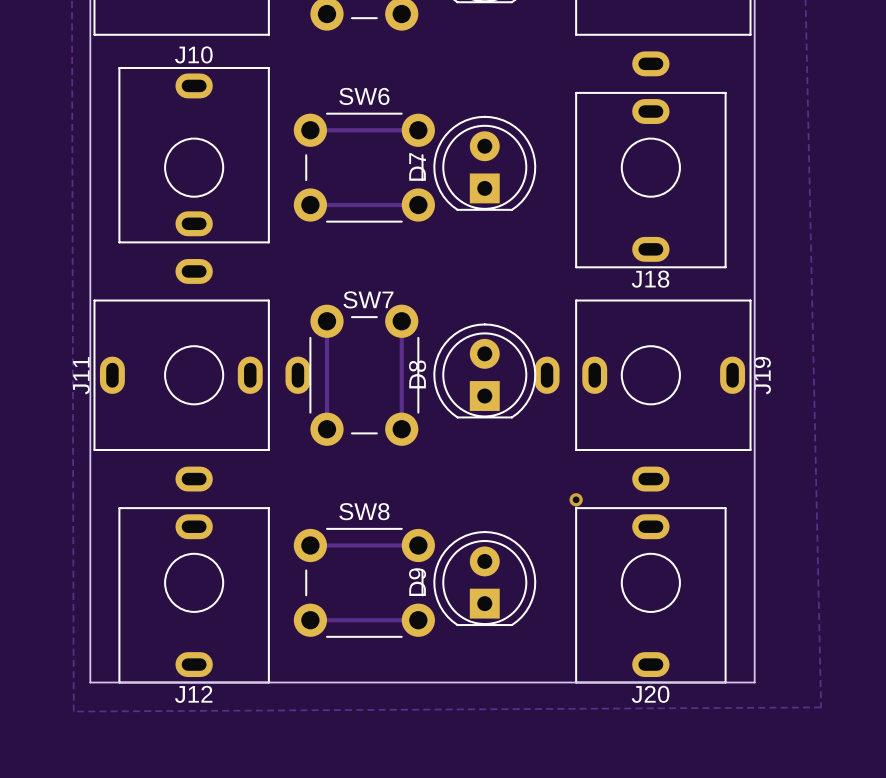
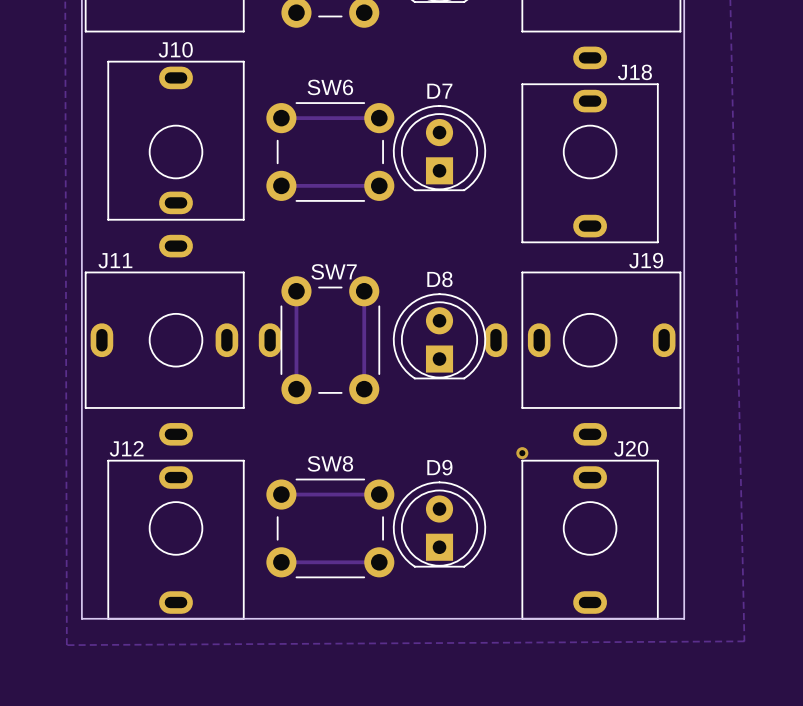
D7 name rotation: 0° (417, 166) -> 90° clockwise (439, 91)
D7 name position: D7 (417, 166) -> D7 (439, 91)
J18 name position: J18 (650, 279) -> J18 (634, 72)
D8 name rotation: 0° (417, 374) -> 90° clockwise (439, 279)
D8 name position: D8 (417, 374) -> D8 (439, 279)
J11 name rotation: 0° (81, 375) -> 90° clockwise (115, 260)
J11 name position: J11 (81, 375) -> J11 (115, 260)
J19 name rotation: 0° (762, 375) -> 90° clockwise (646, 260)
J19 name position: J19 (762, 375) -> J19 (646, 260)
D9 name rotation: 0° (417, 582) -> 90° clockwise (439, 467)
D9 name position: D9 (417, 582) -> D9 (439, 467)
J12 name position: J12 (193, 694) -> J12 (126, 448)
J20 name position: J20 (650, 694) -> J20 (631, 448)

